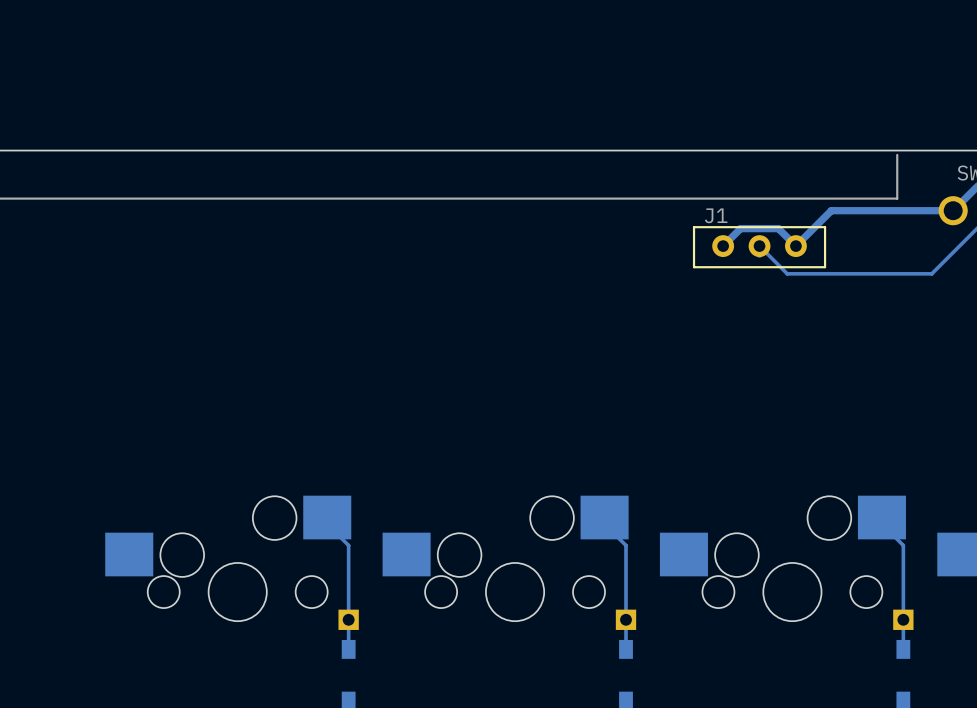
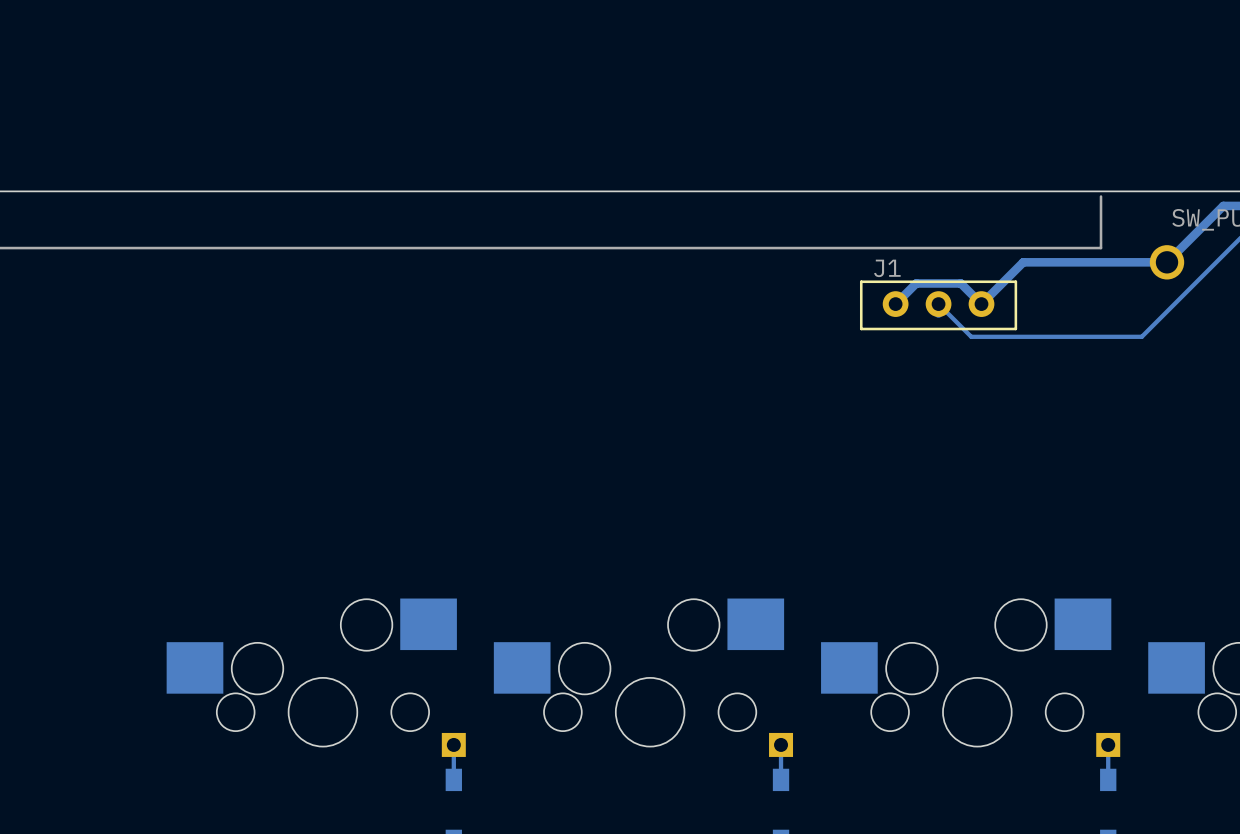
bottom track: (320, 517) (348, 545) (348, 619) -> none
bottom track: (598, 517) (626, 545) (626, 619) -> none
bottom track: (875, 517) (903, 545) (903, 619) -> none

